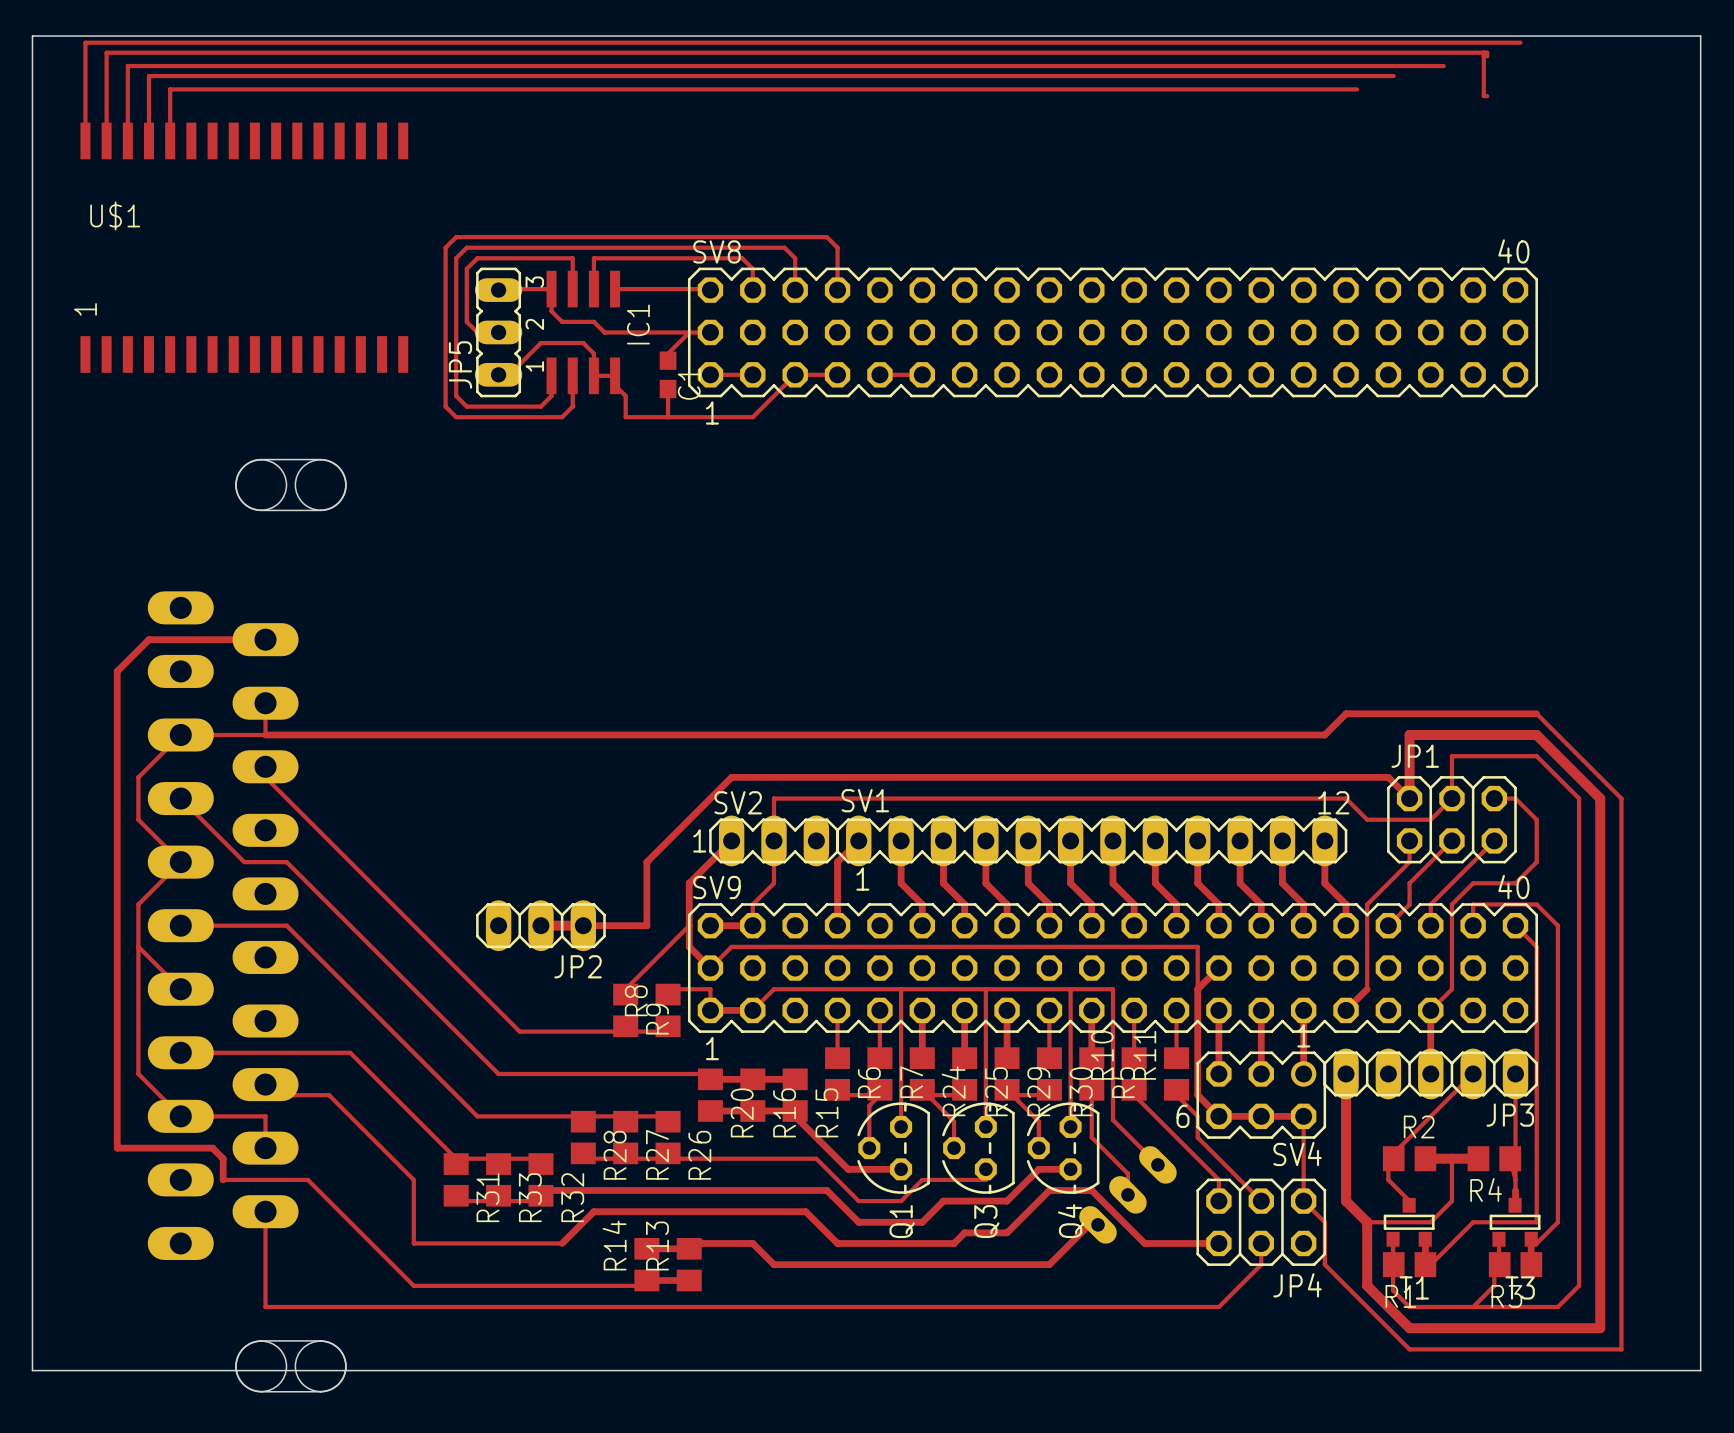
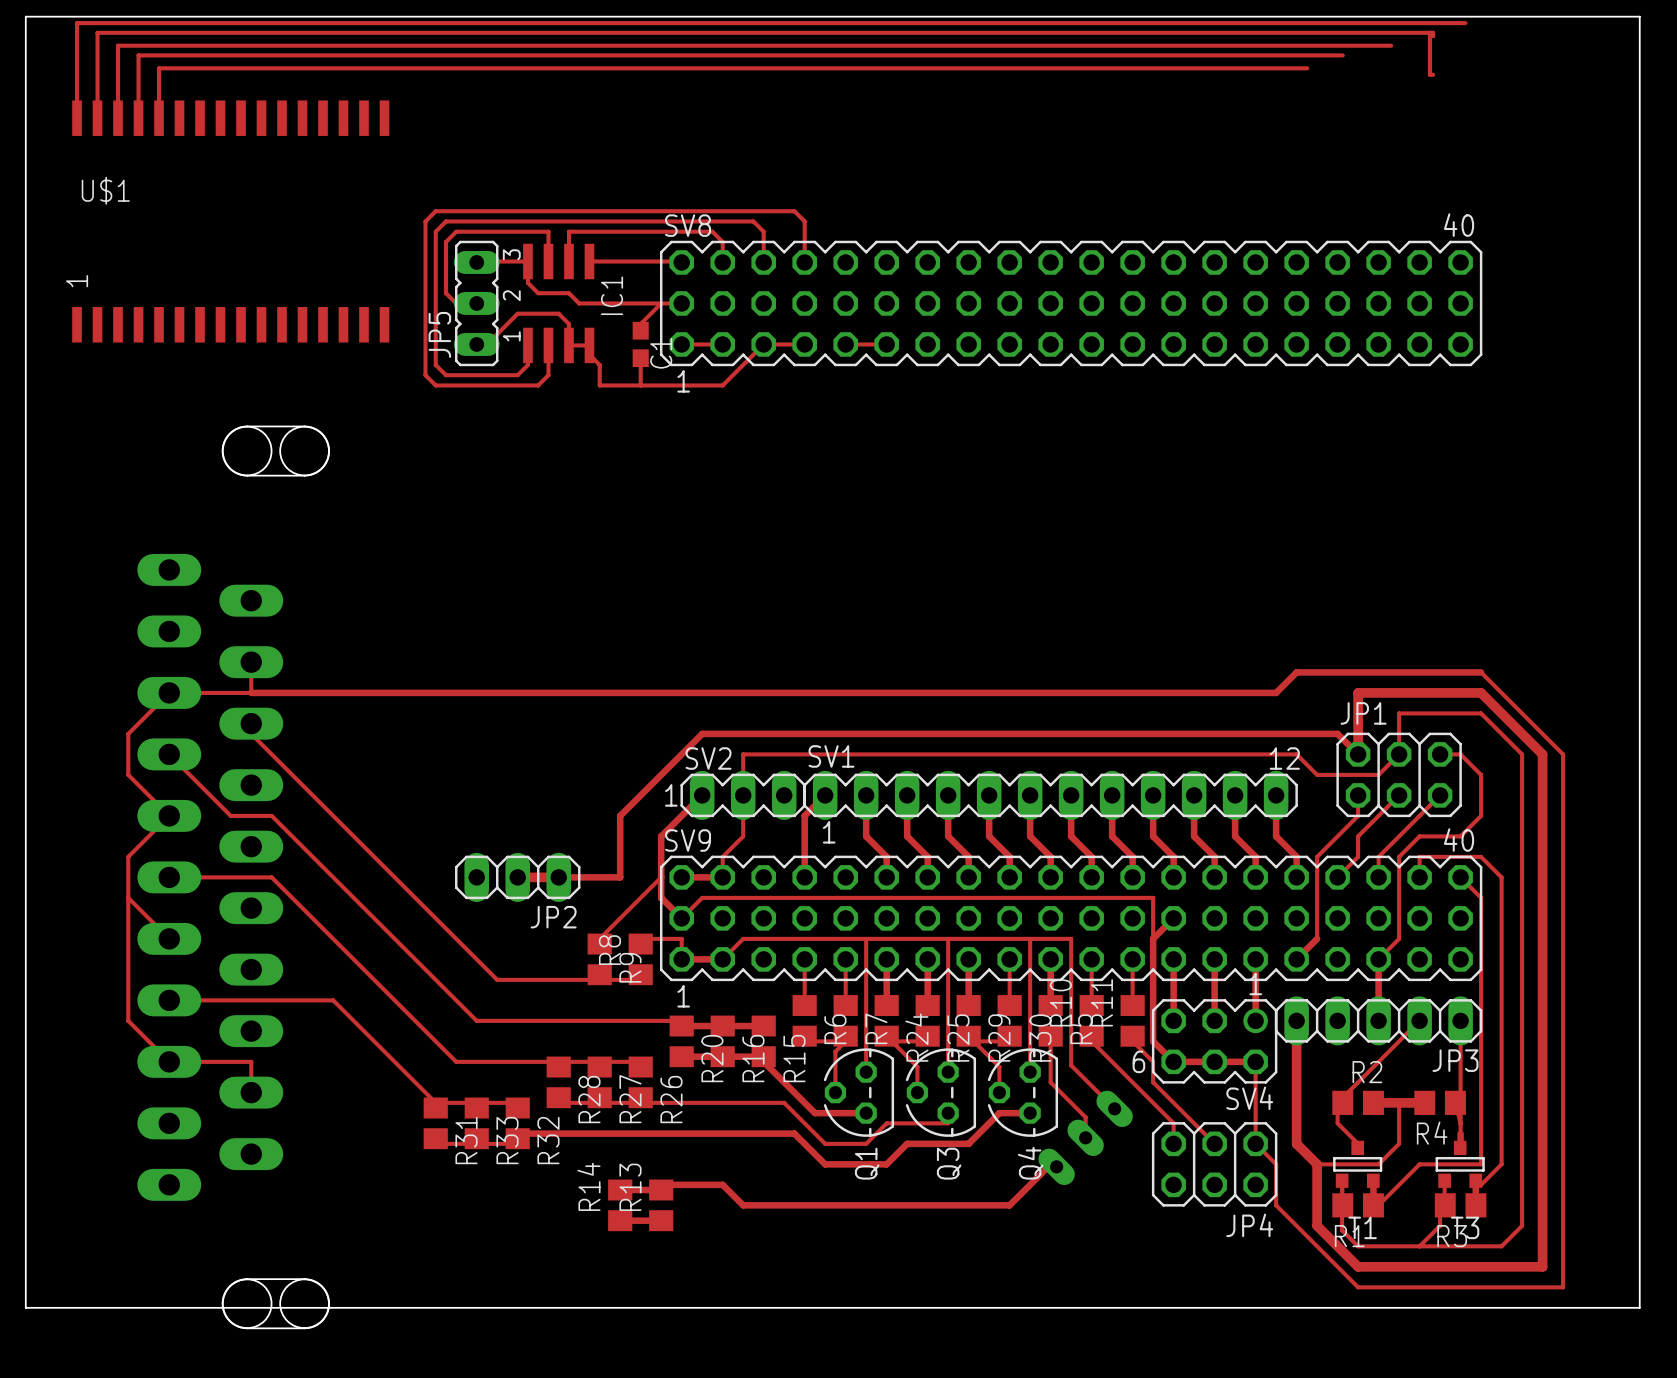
track: (265, 639) (149, 639) (117, 671) (117, 1148) (212, 1148) (223, 1158) (223, 1179) (307, 1179) (413, 1285) (646, 1285) (646, 1280) -> none
track: (265, 1084) (265, 1095) (329, 1095) (413, 1179) (413, 1243) (562, 1243) (593, 1211) (805, 1211) (837, 1243) (954, 1243) (964, 1232) (1007, 1232) (1049, 1190) (1091, 1190) (1144, 1243) (1218, 1243) -> none
track: (265, 1211) (265, 1307) (1218, 1307) (1261, 1264) (1261, 1243) -> none

